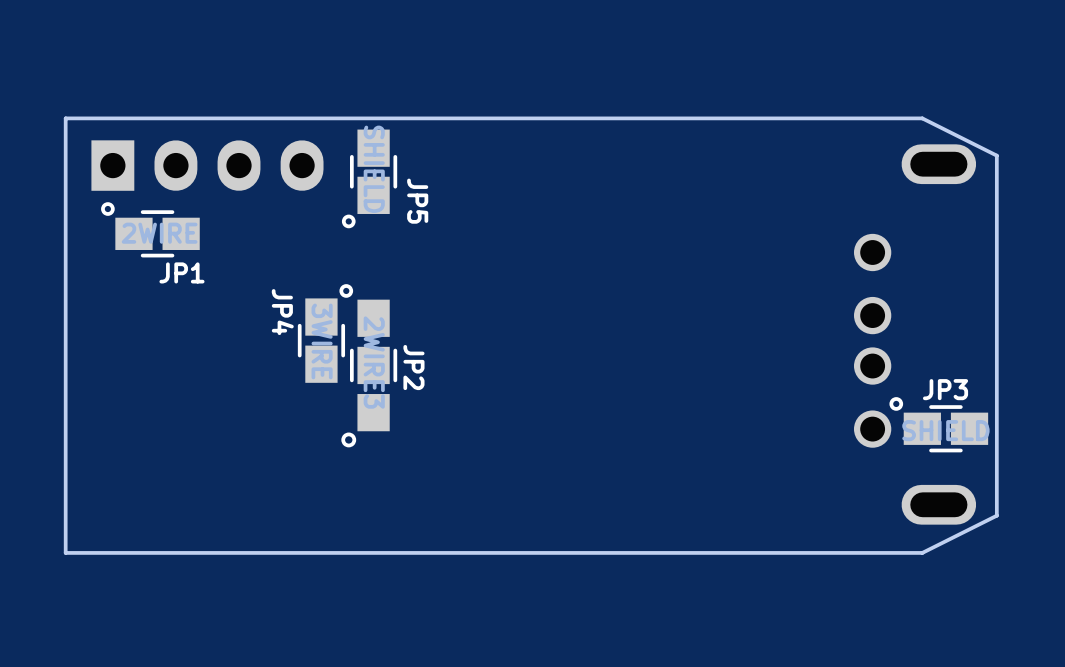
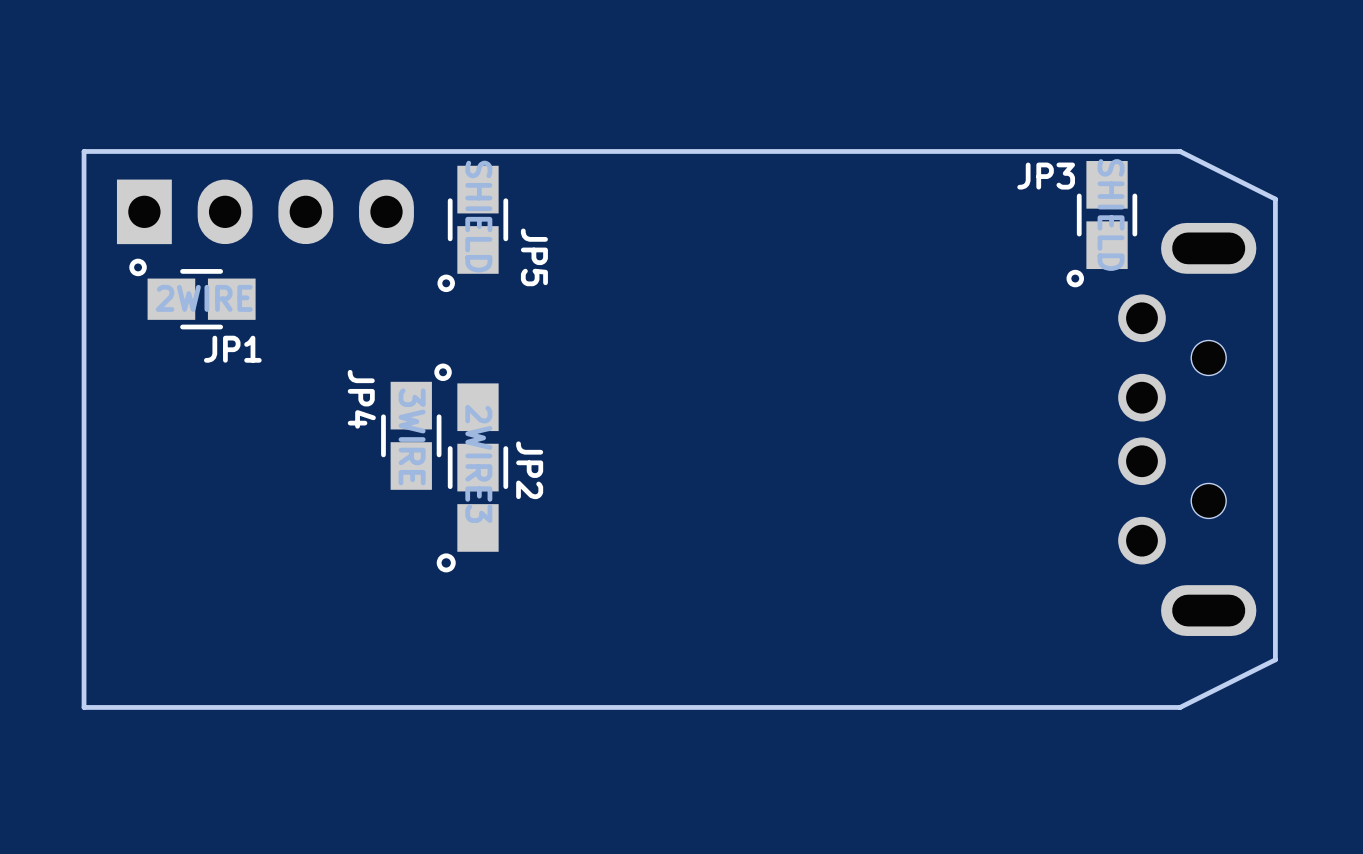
part footprint: [853, 144, 977, 525] -> [1118, 222, 1257, 636]
JP3 rotation: 0° (938, 424) -> 90° counterclockwise (1101, 224)
JP3 position: (938, 424) -> (1101, 224)

